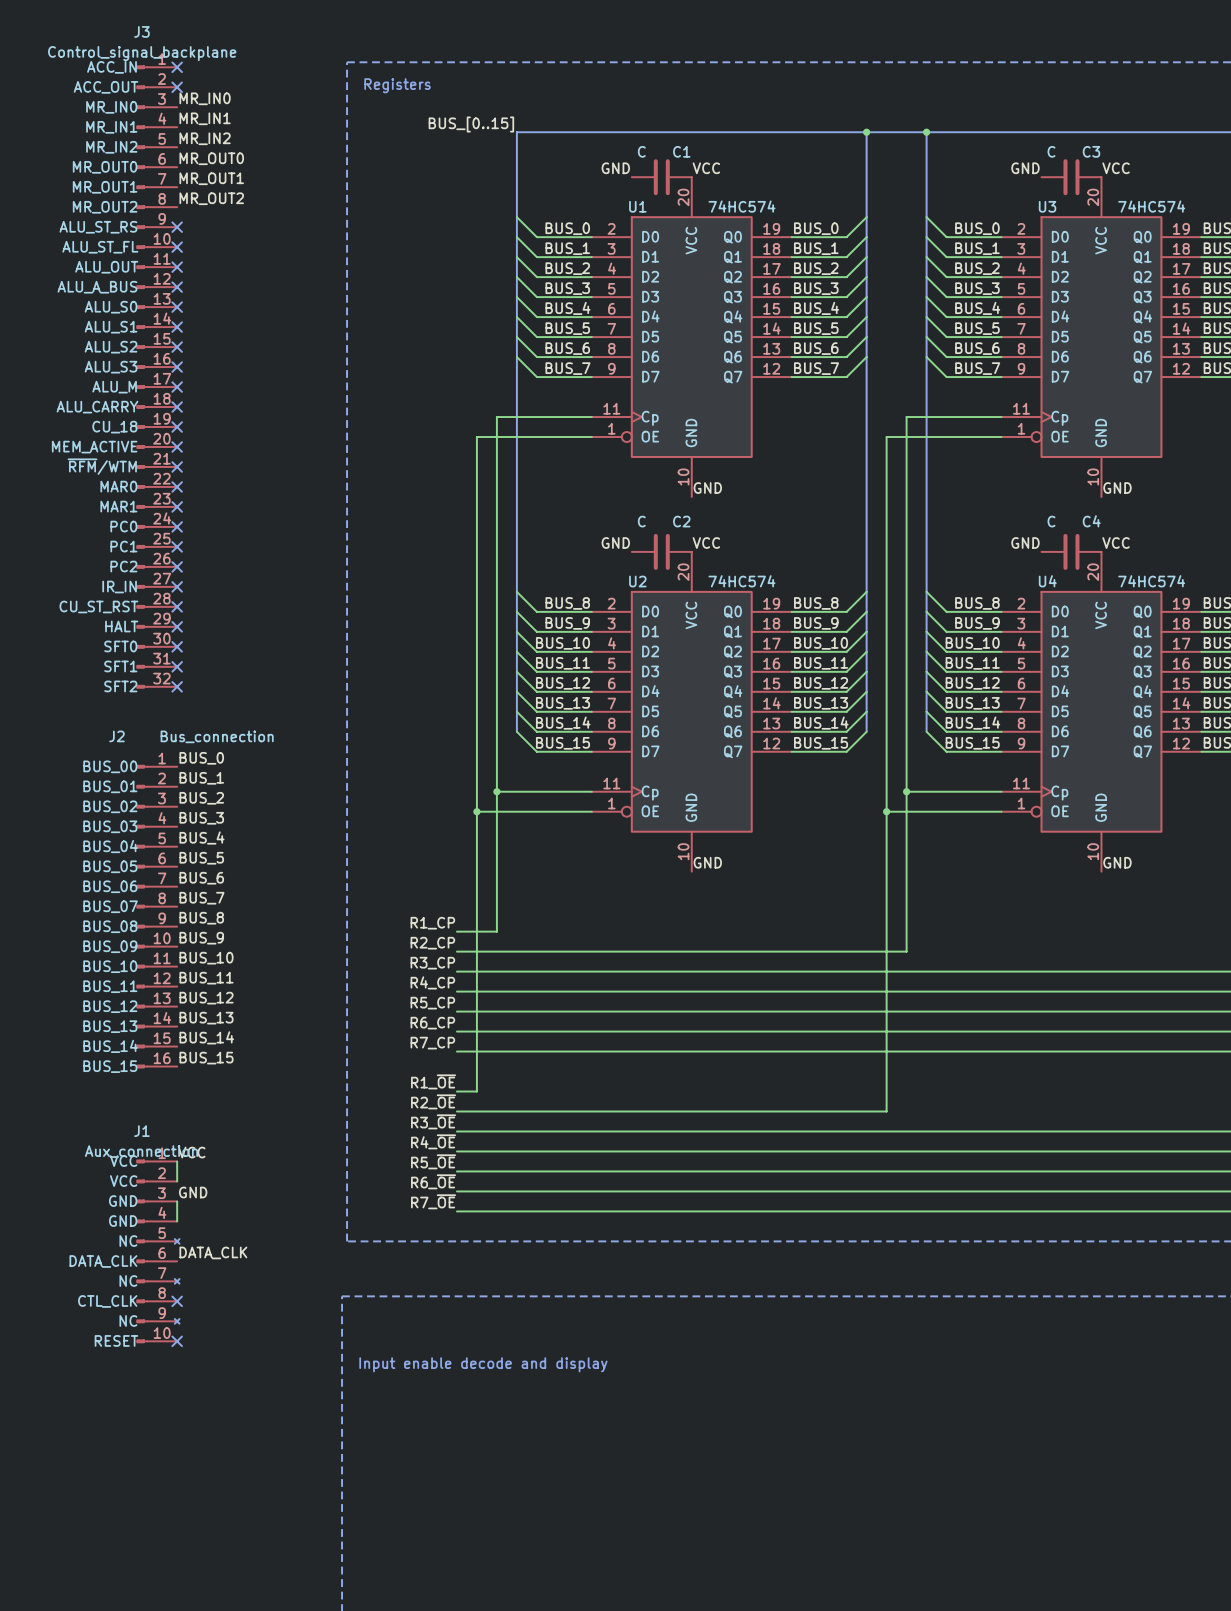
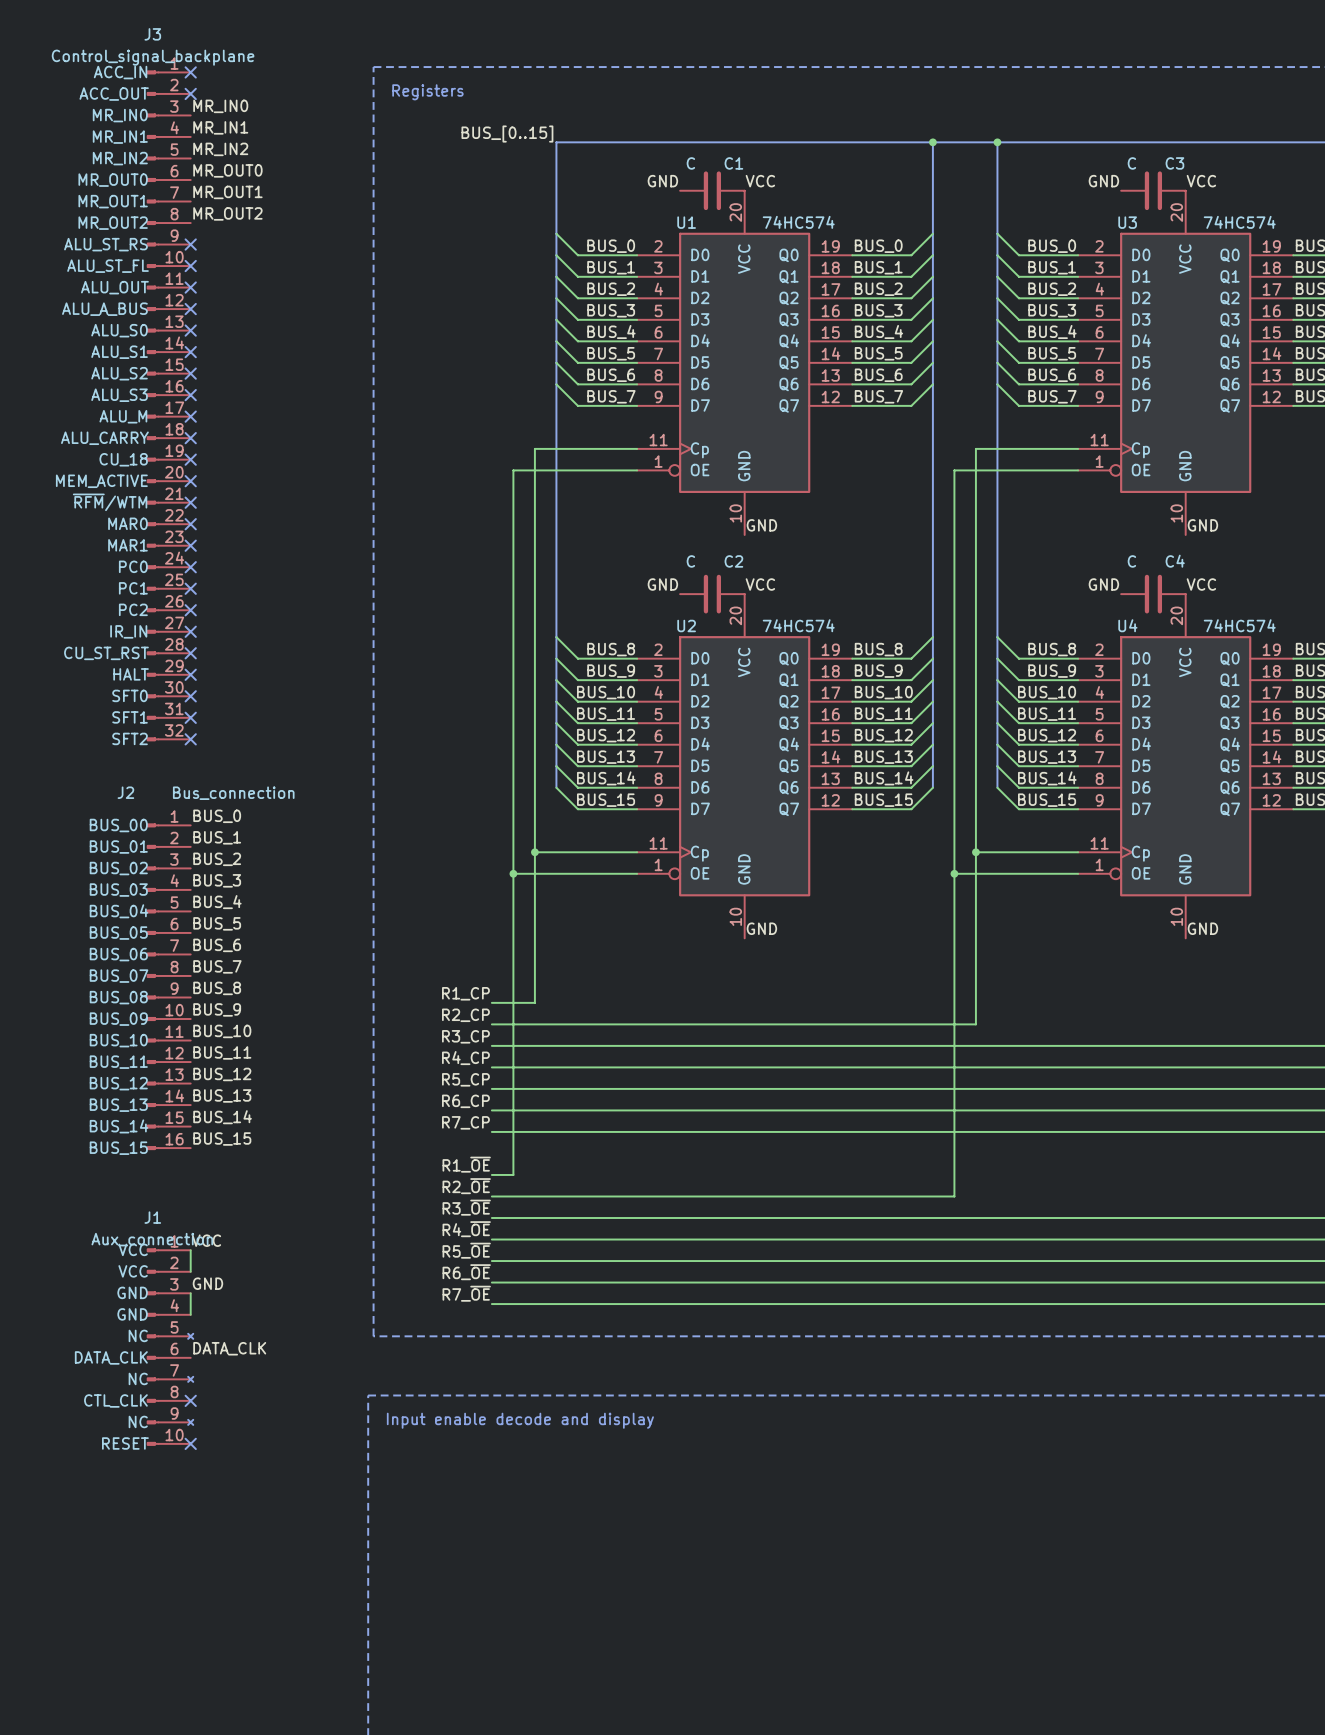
text position: Input enable decode and display (483, 1364) -> Input enable decode and display (520, 1420)

